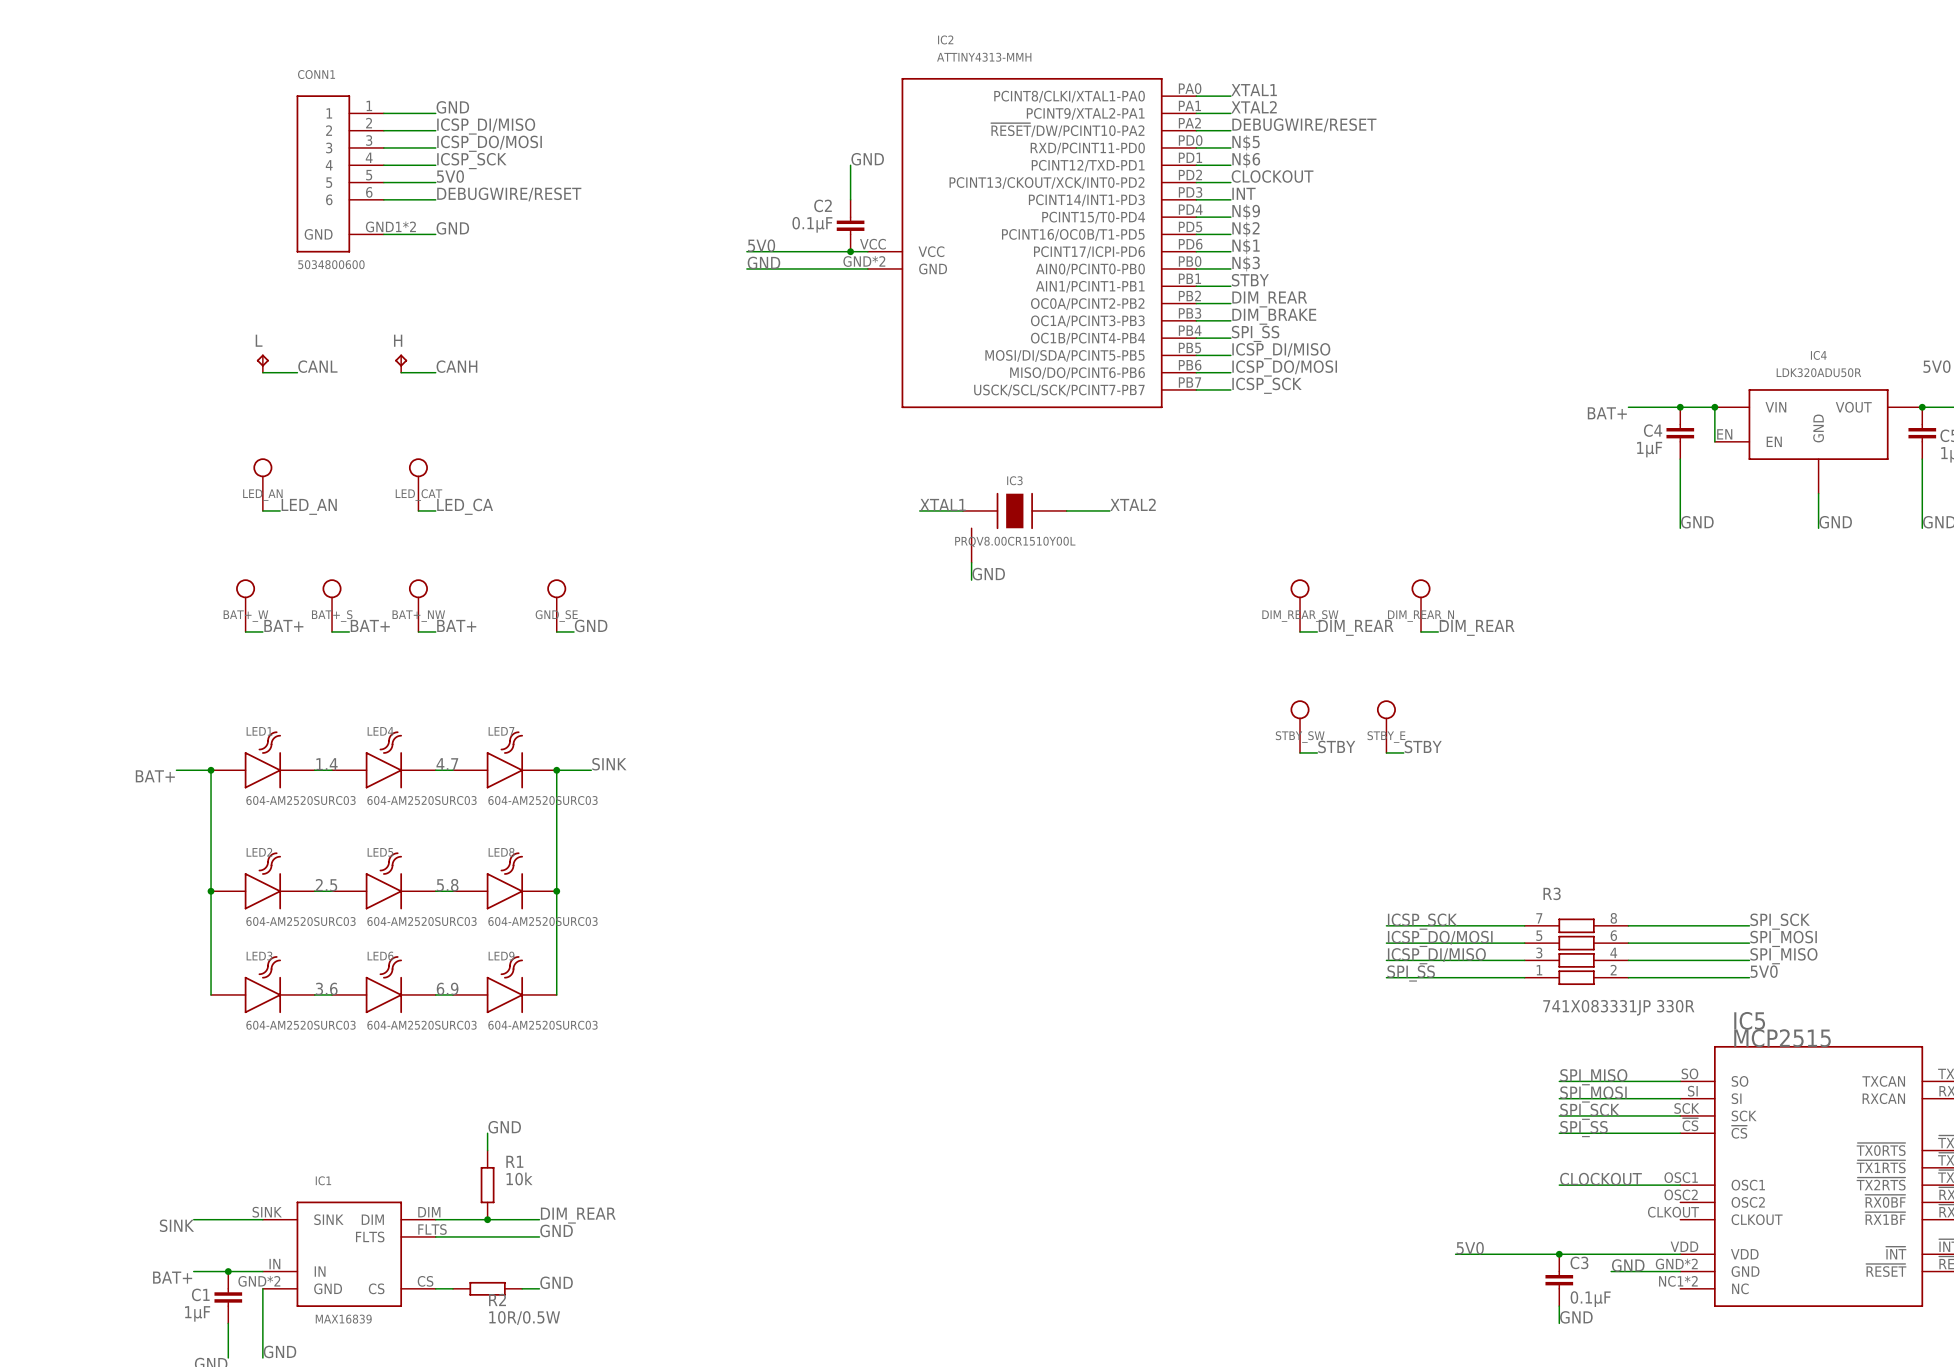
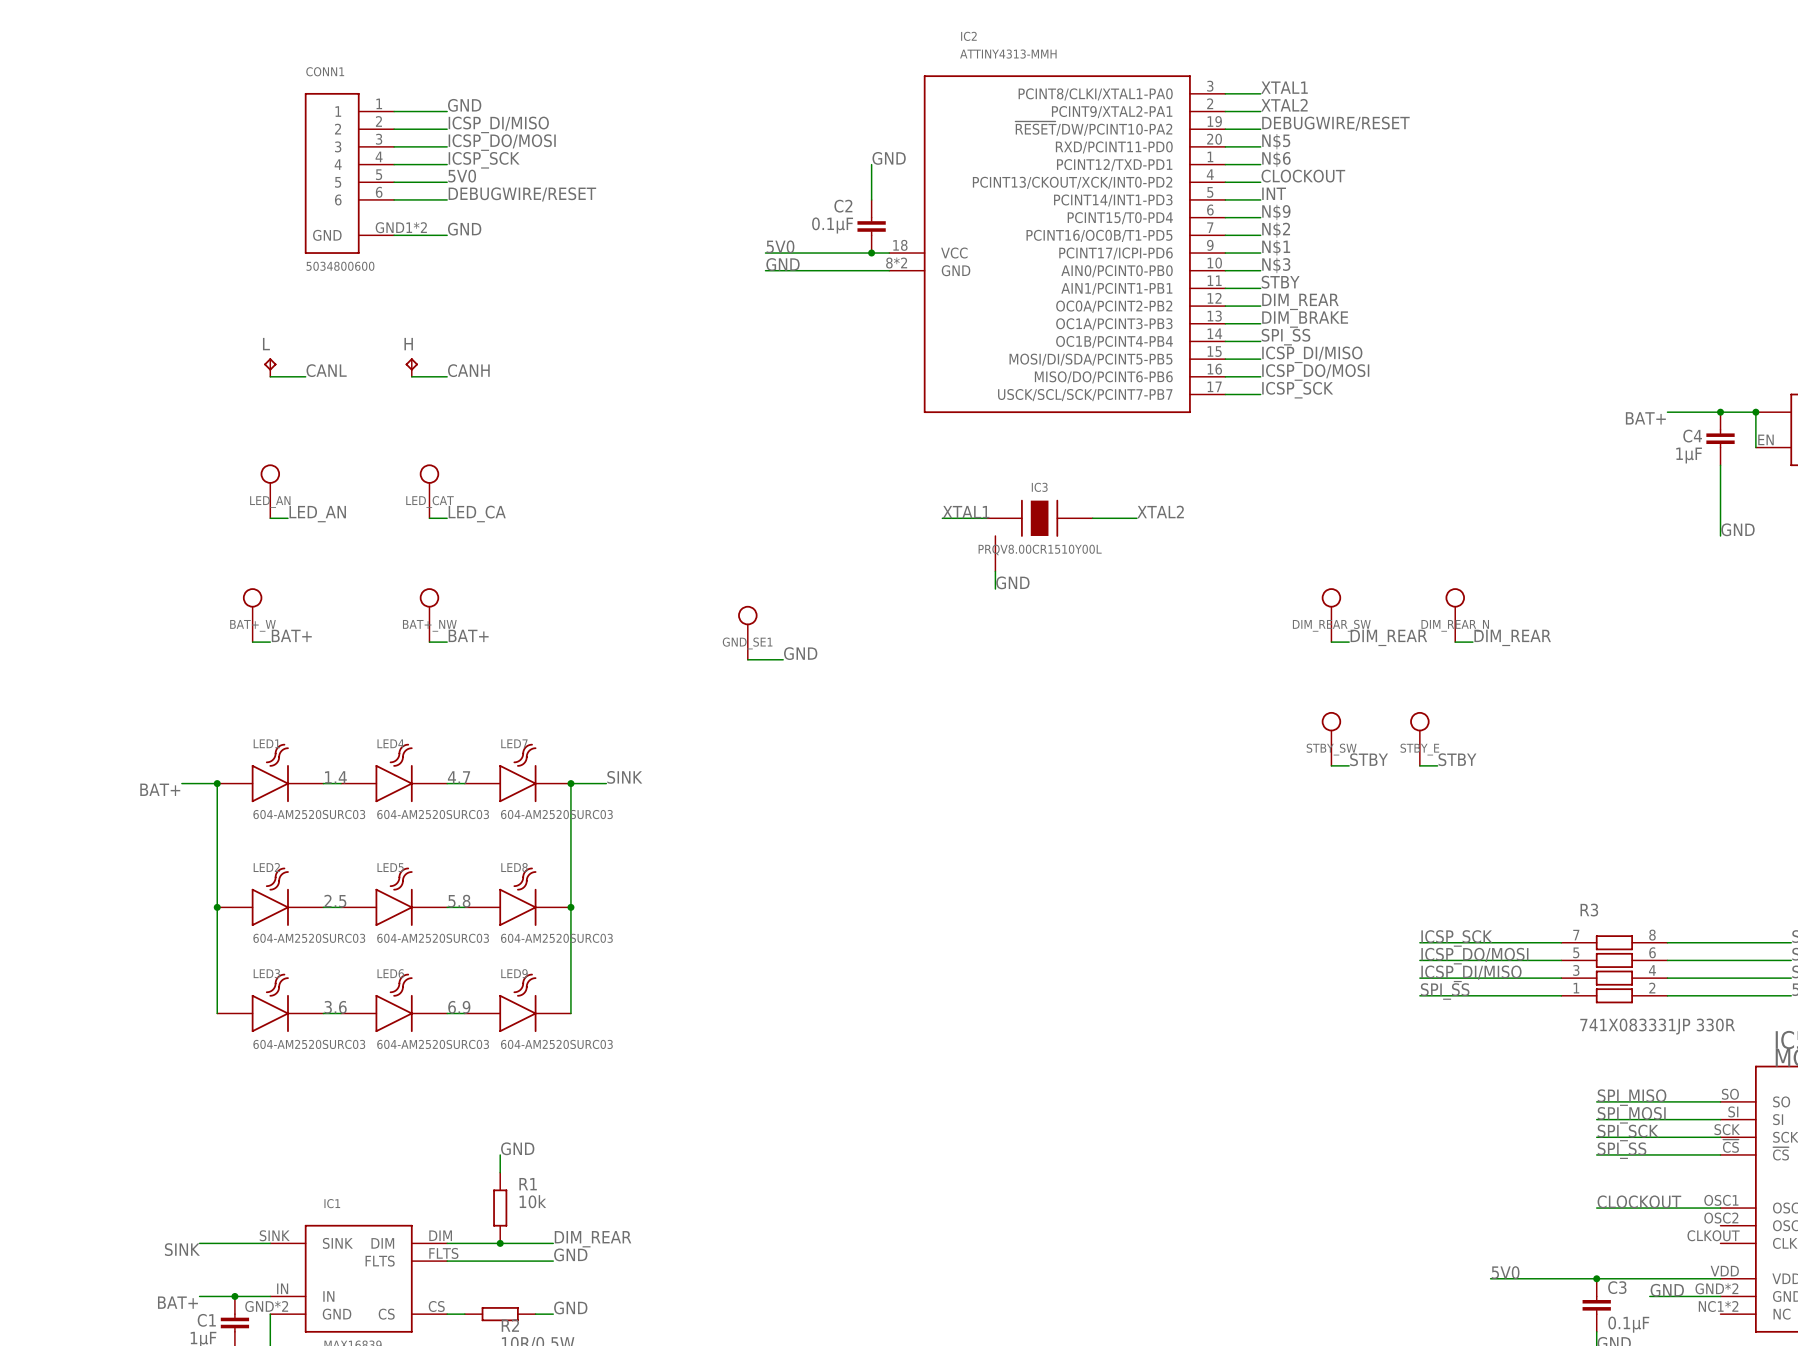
IC2 symbol: [867, 77, 1197, 409] -> [889, 75, 1226, 414]
BAT+_S: (332, 605) -> none
GND_SE: (556, 605) -> none
GND_SE1: none -> (747, 632)
label: BAT+ (370, 625) -> none
label: GND (591, 625) -> none
wire: (332, 631) (349, 631) -> none
wire: (556, 631) (574, 631) -> none
label: none -> GND (800, 653)
wire: none -> (747, 659) (783, 659)

